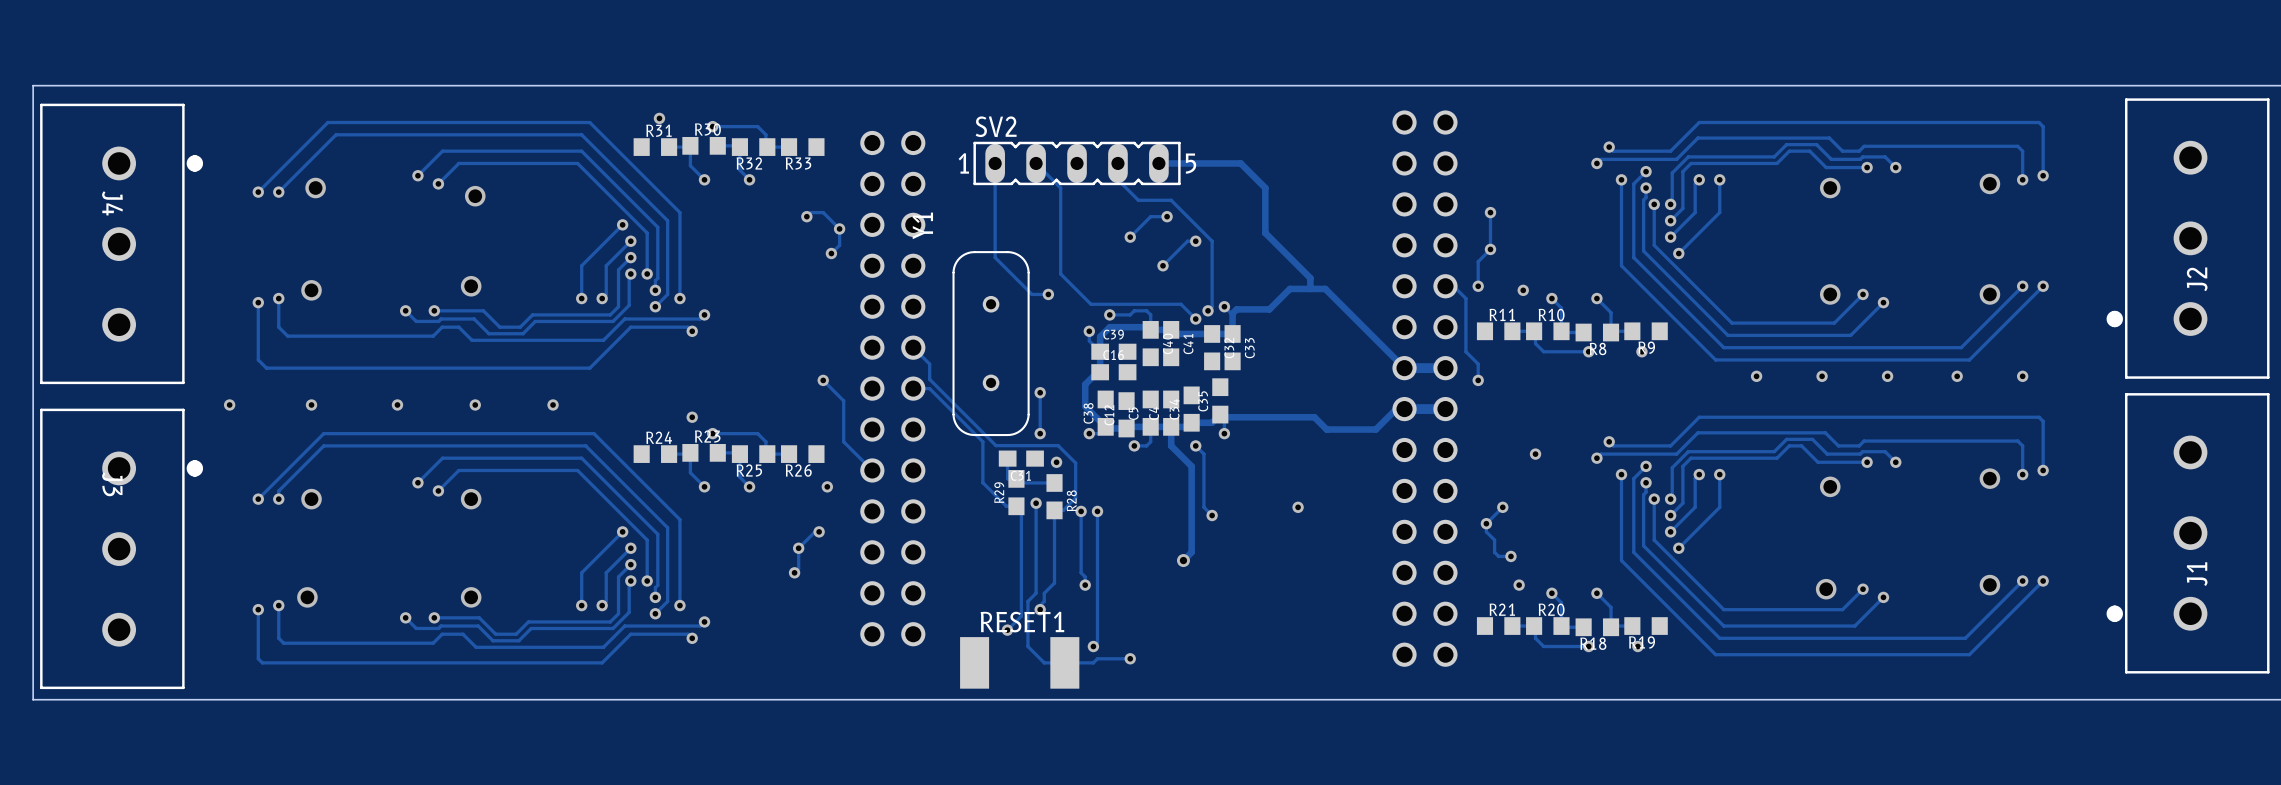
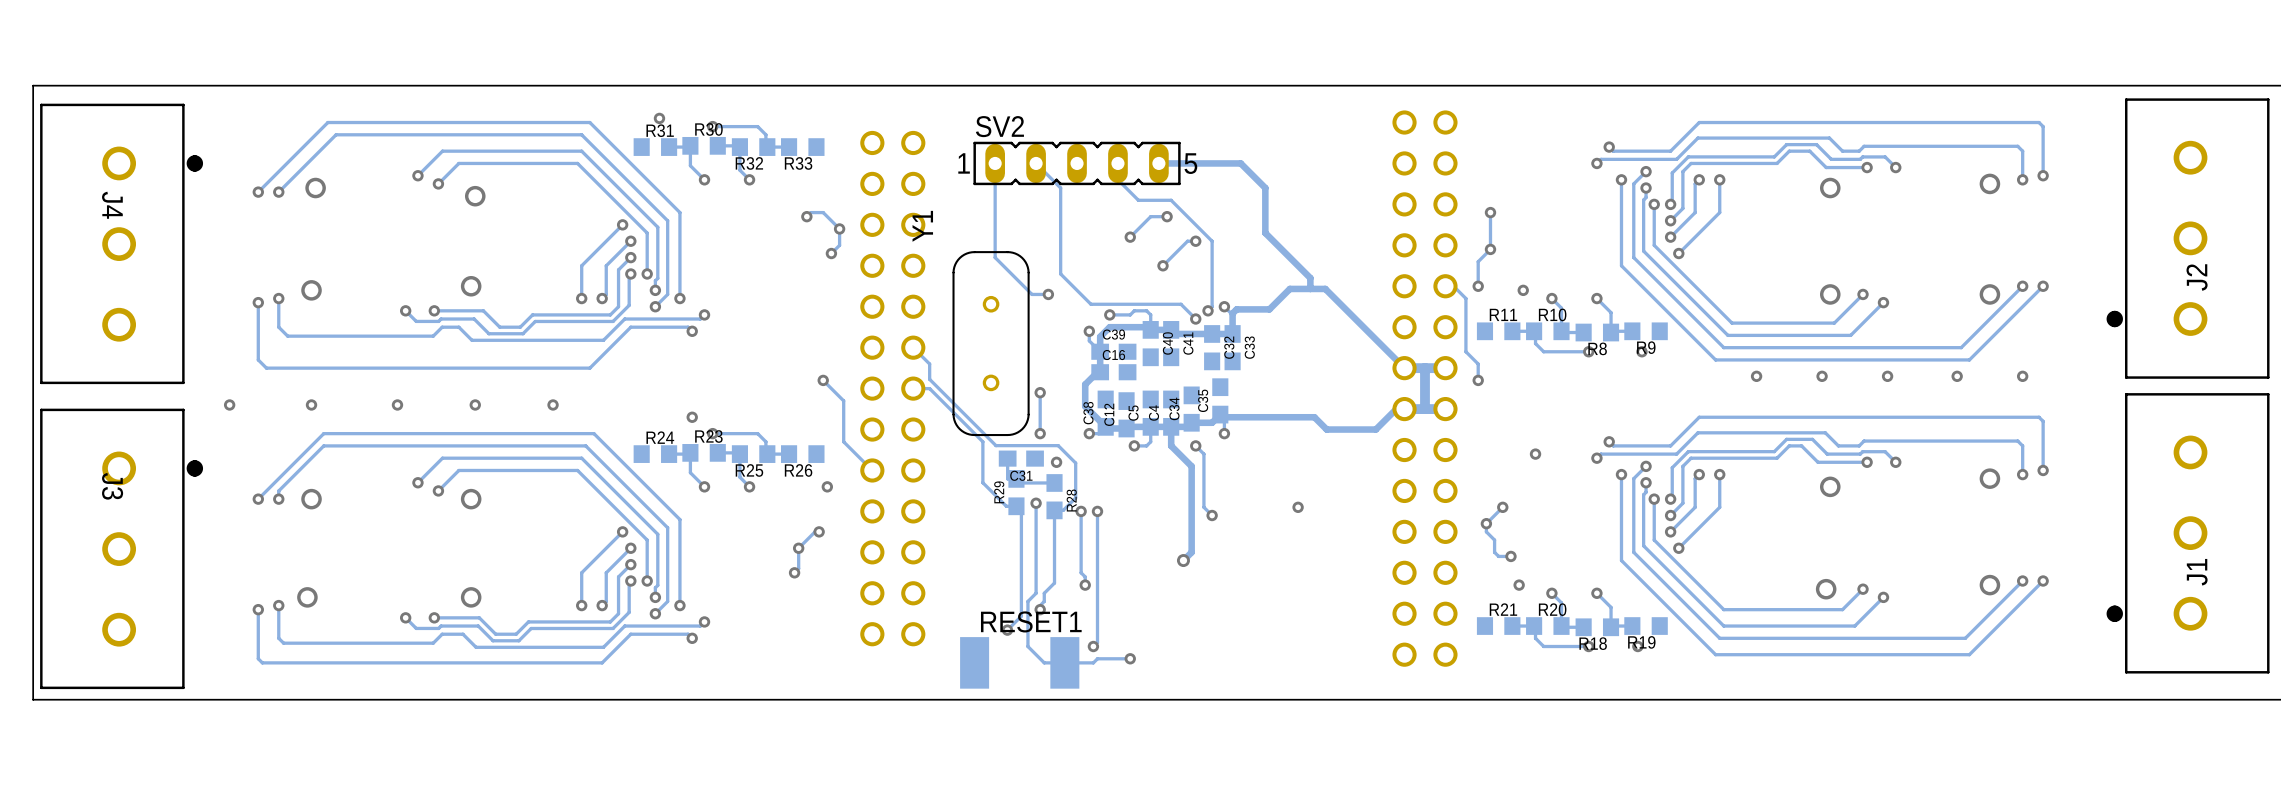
track: none -> (1424, 368) (1424, 409)

